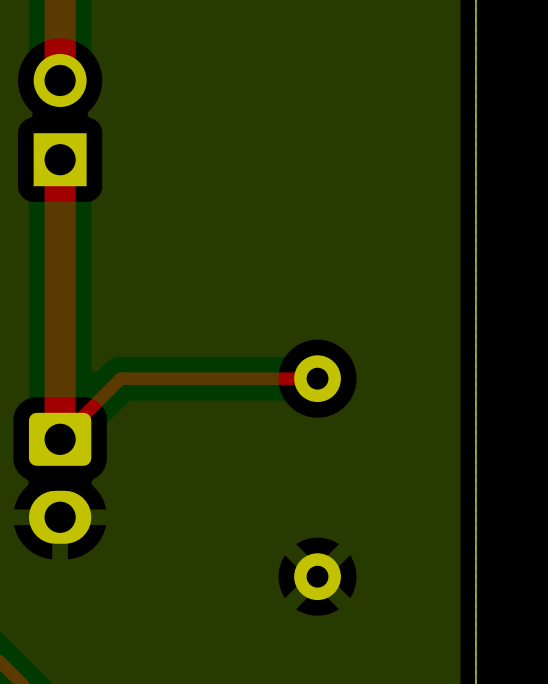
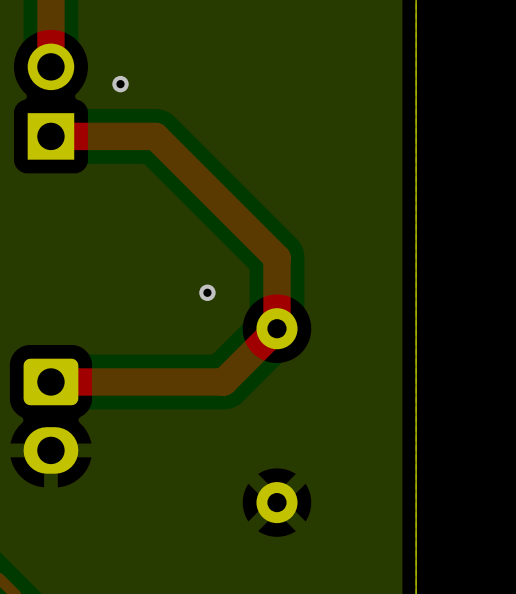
via: none -> (120, 84)
top track: (60, 159) (60, 439) (120, 378) (317, 378) -> (50, 136) (155, 136) (277, 258) (277, 328) (223, 381) (50, 381)
via: none -> (207, 292)

